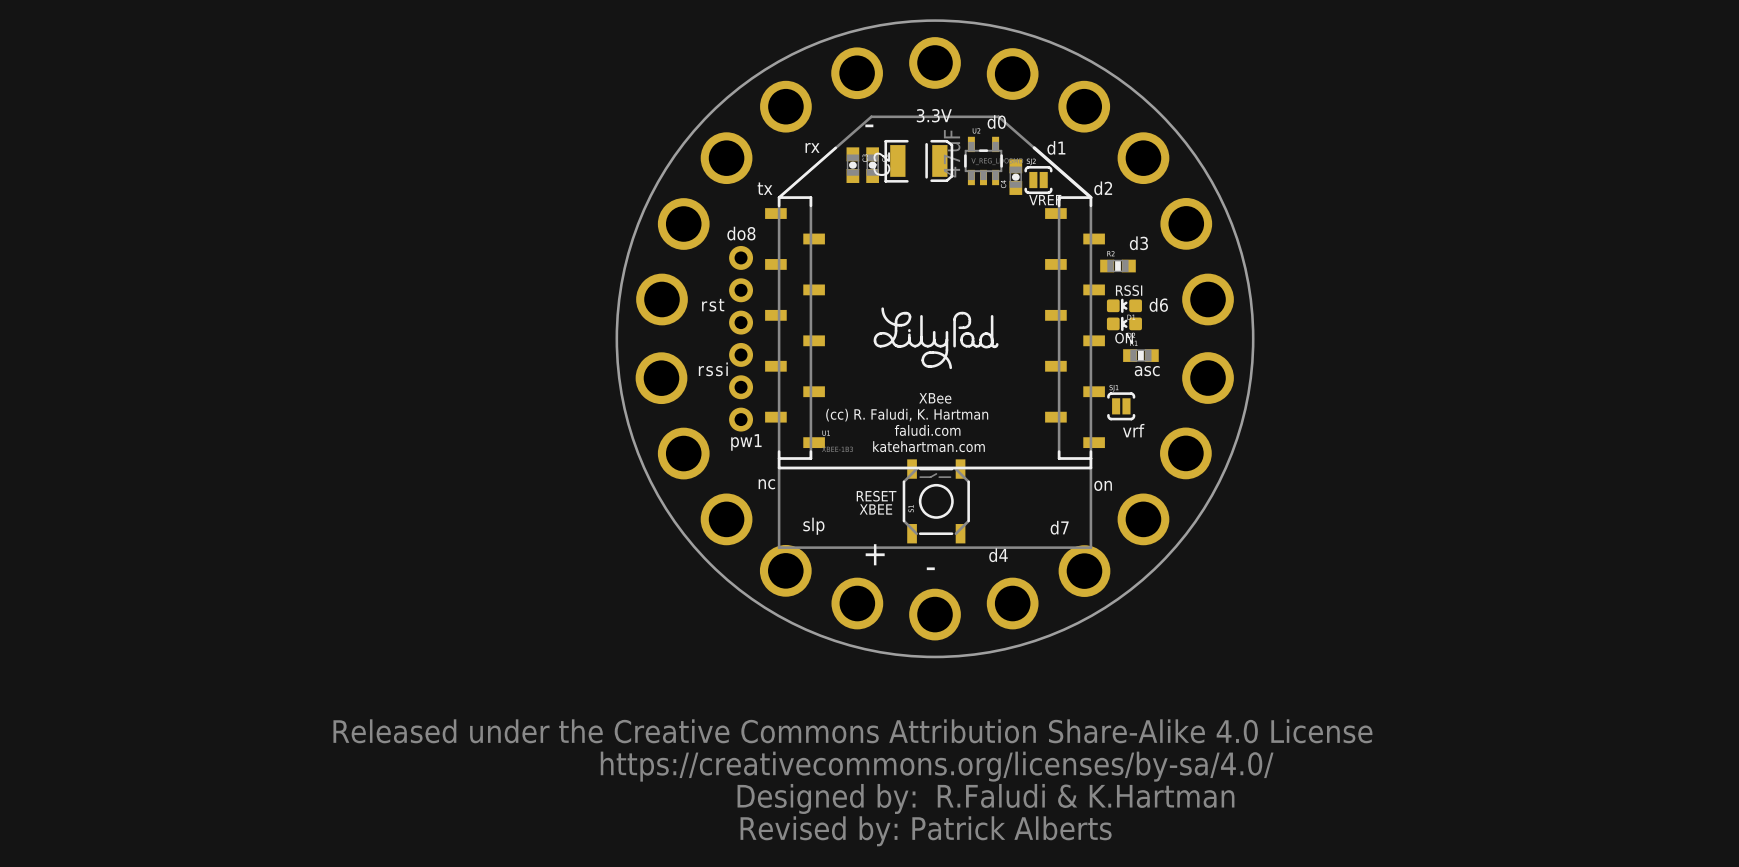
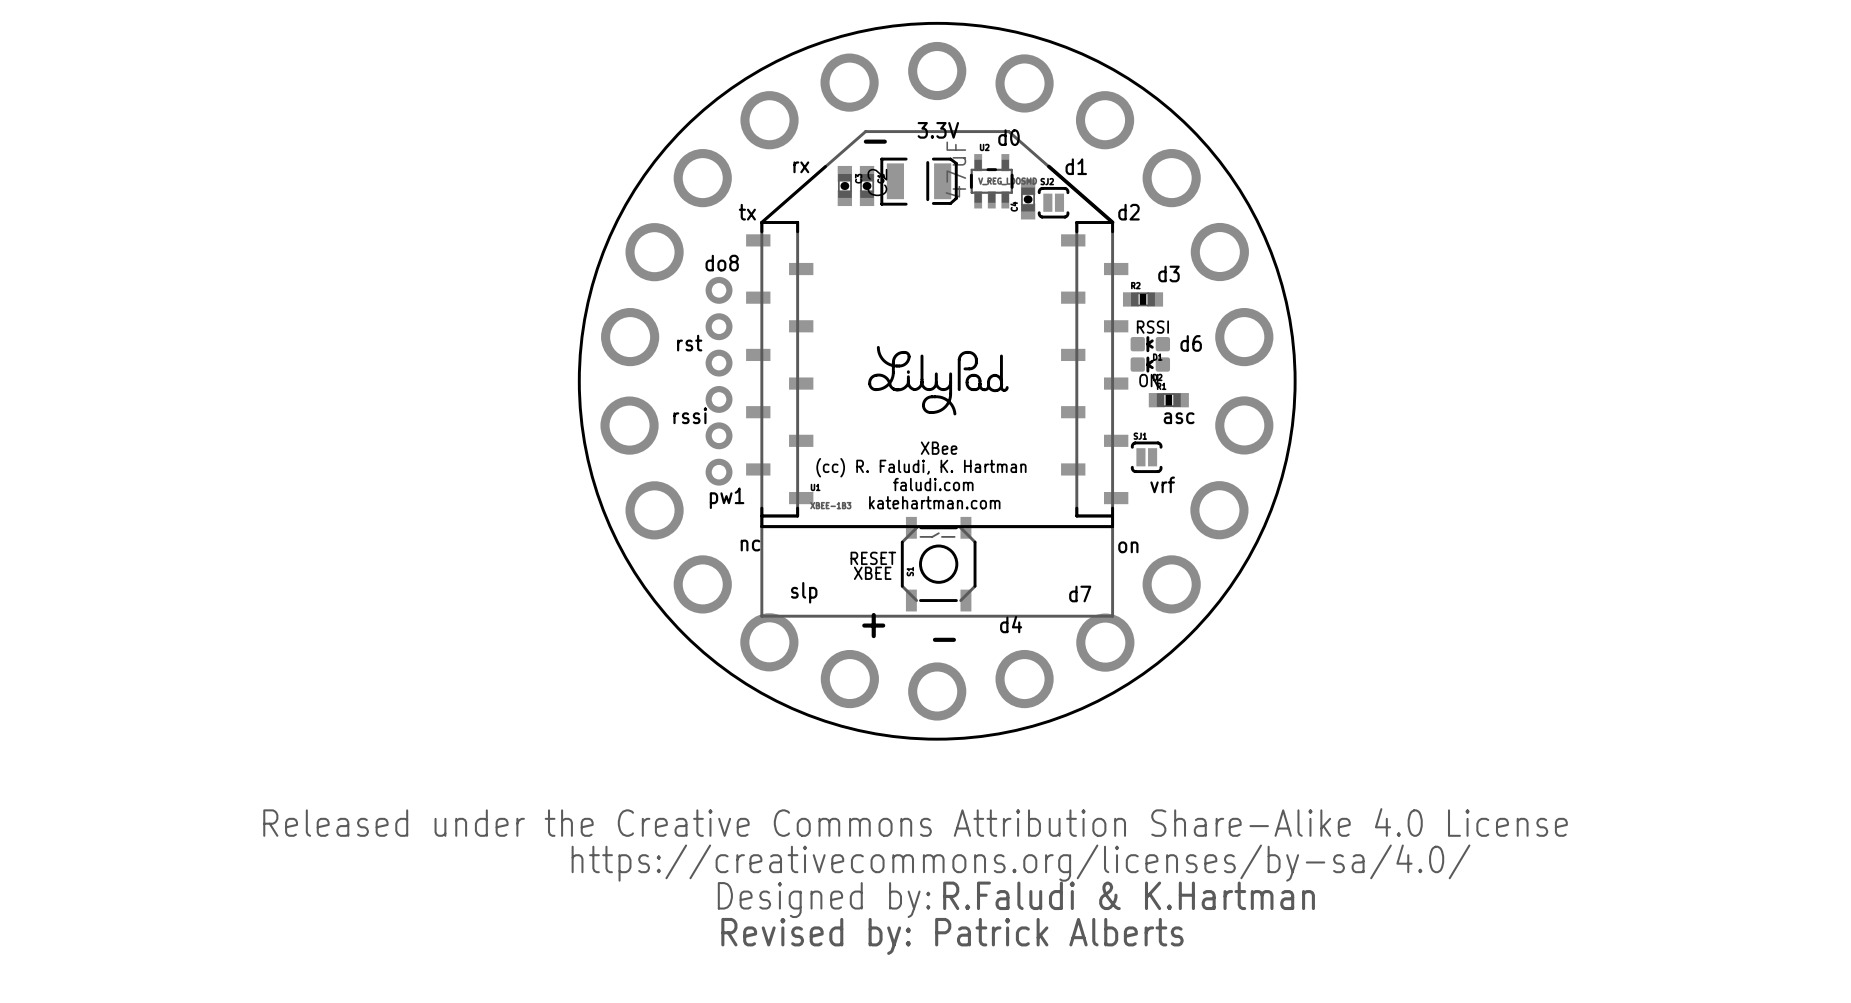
text: VREF (1045, 200) -> none

